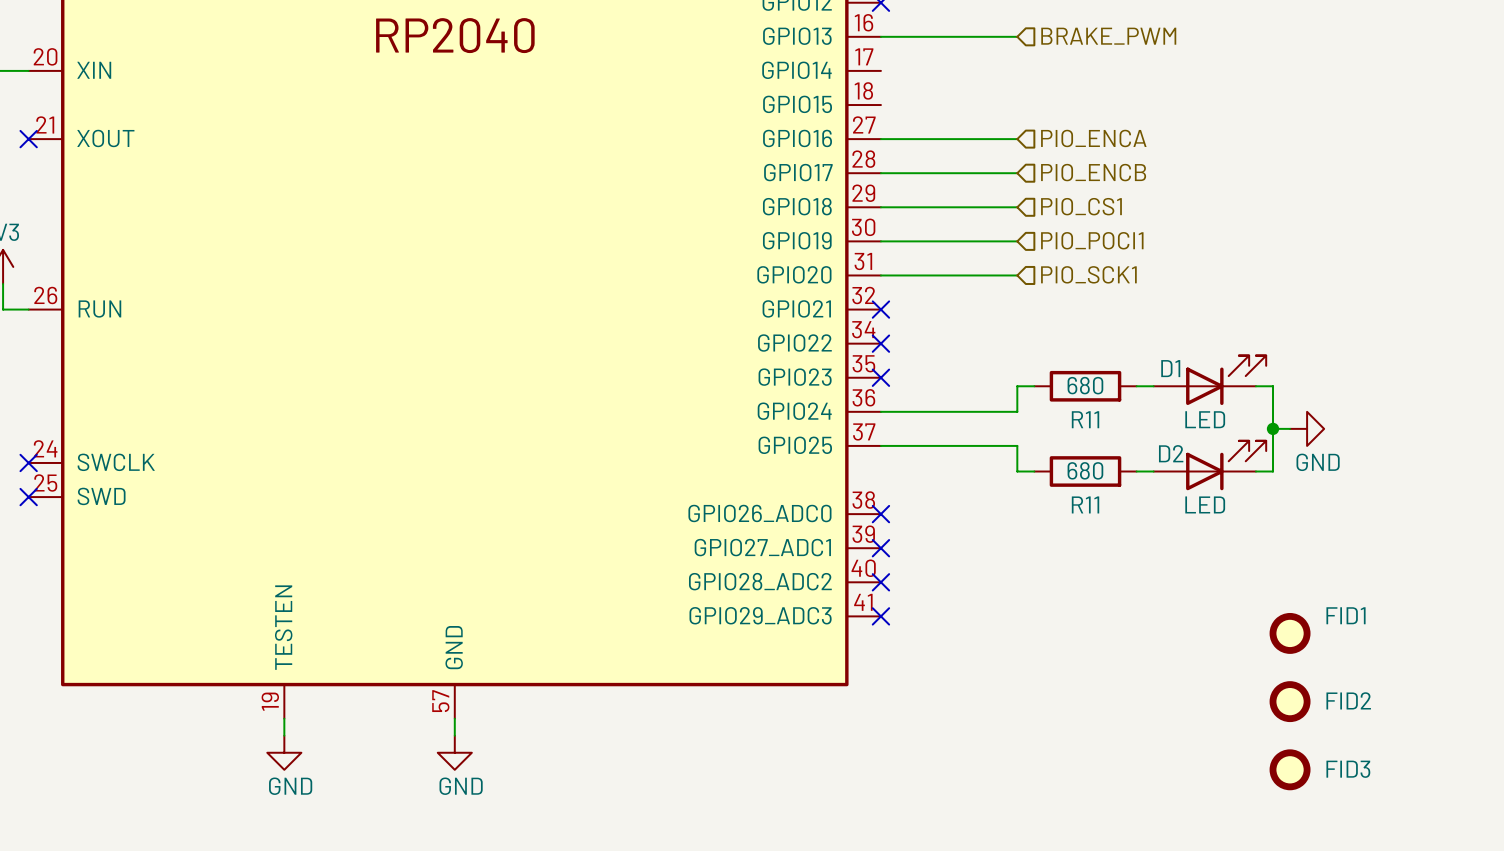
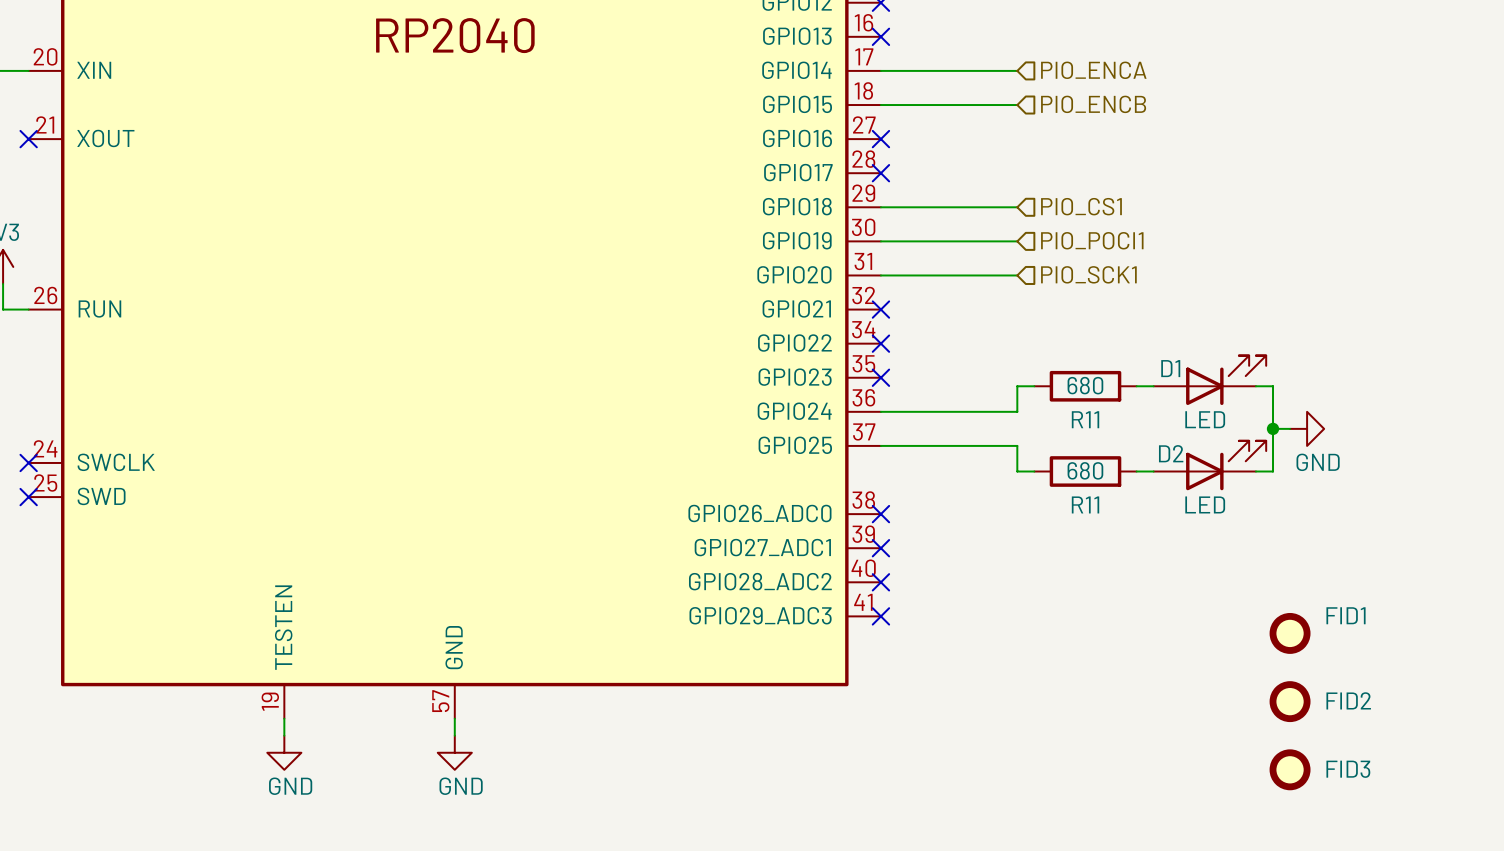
wire: (880, 36) (1017, 36) -> (880, 70) (1017, 70)
no-connect mark: none -> (880, 36)
hierarchical label: BRAKE_PWM (1108, 36) -> none
hierarchical label position: PIO_ENCA (1093, 138) -> PIO_ENCA (1093, 70)
wire: (880, 139) (1017, 139) -> (880, 105) (1017, 105)
no-connect mark: none -> (880, 139)
hierarchical label position: PIO_ENCB (1093, 172) -> PIO_ENCB (1093, 104)
wire: (880, 173) (1017, 173) -> none
no-connect mark: none -> (880, 173)

